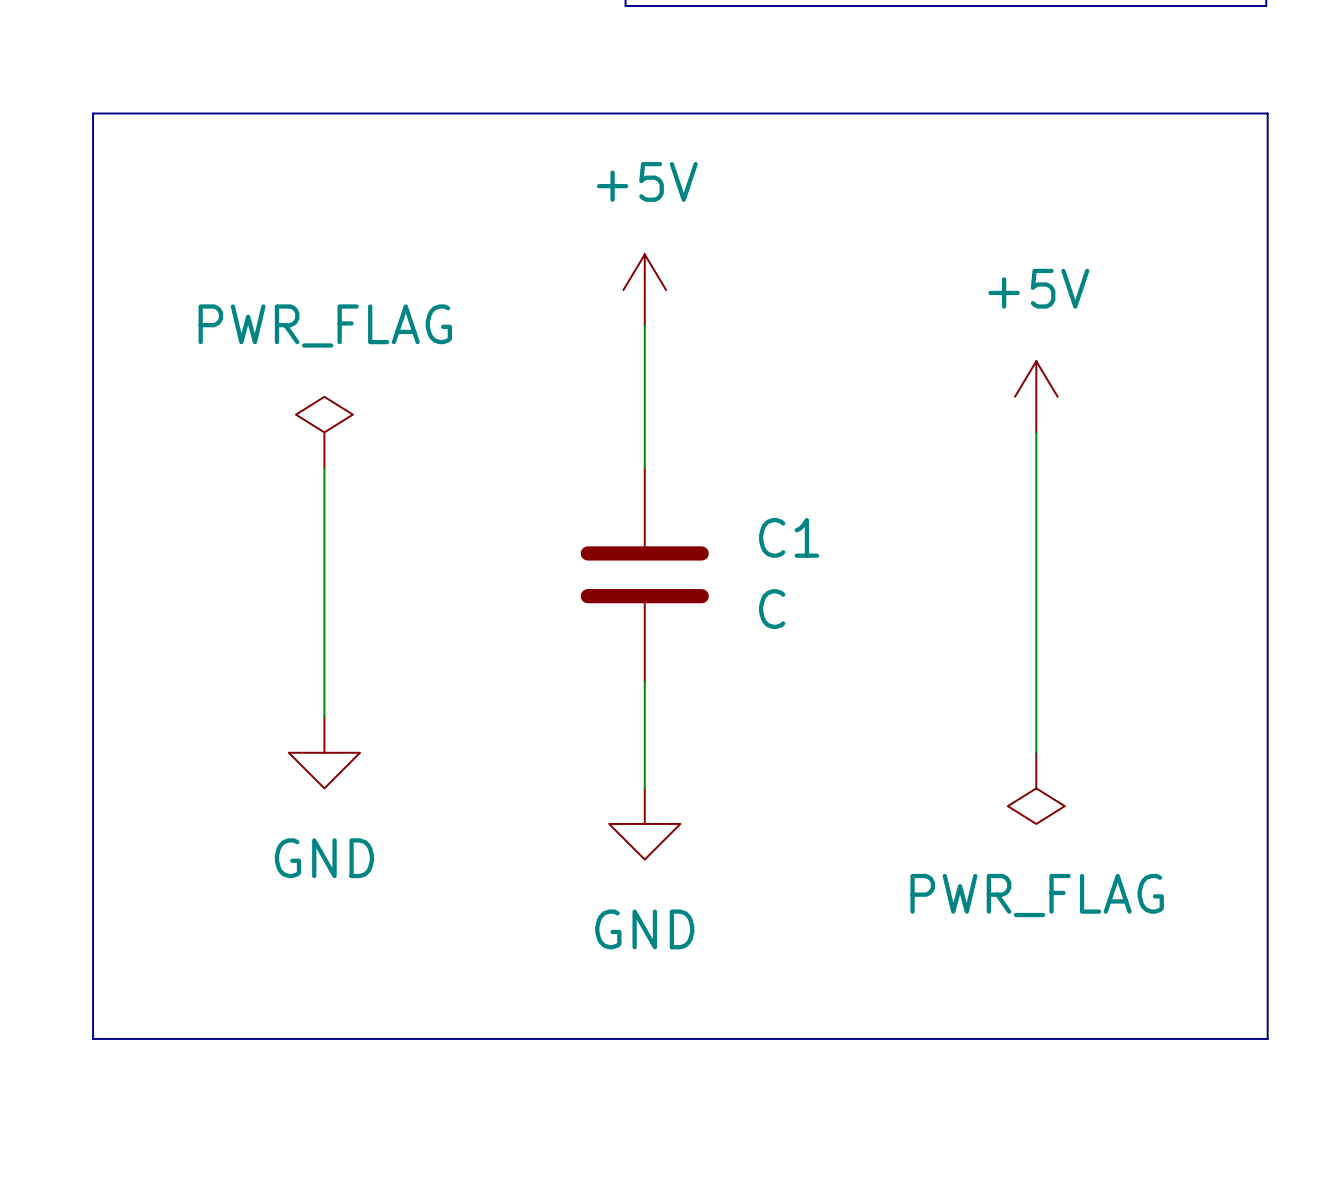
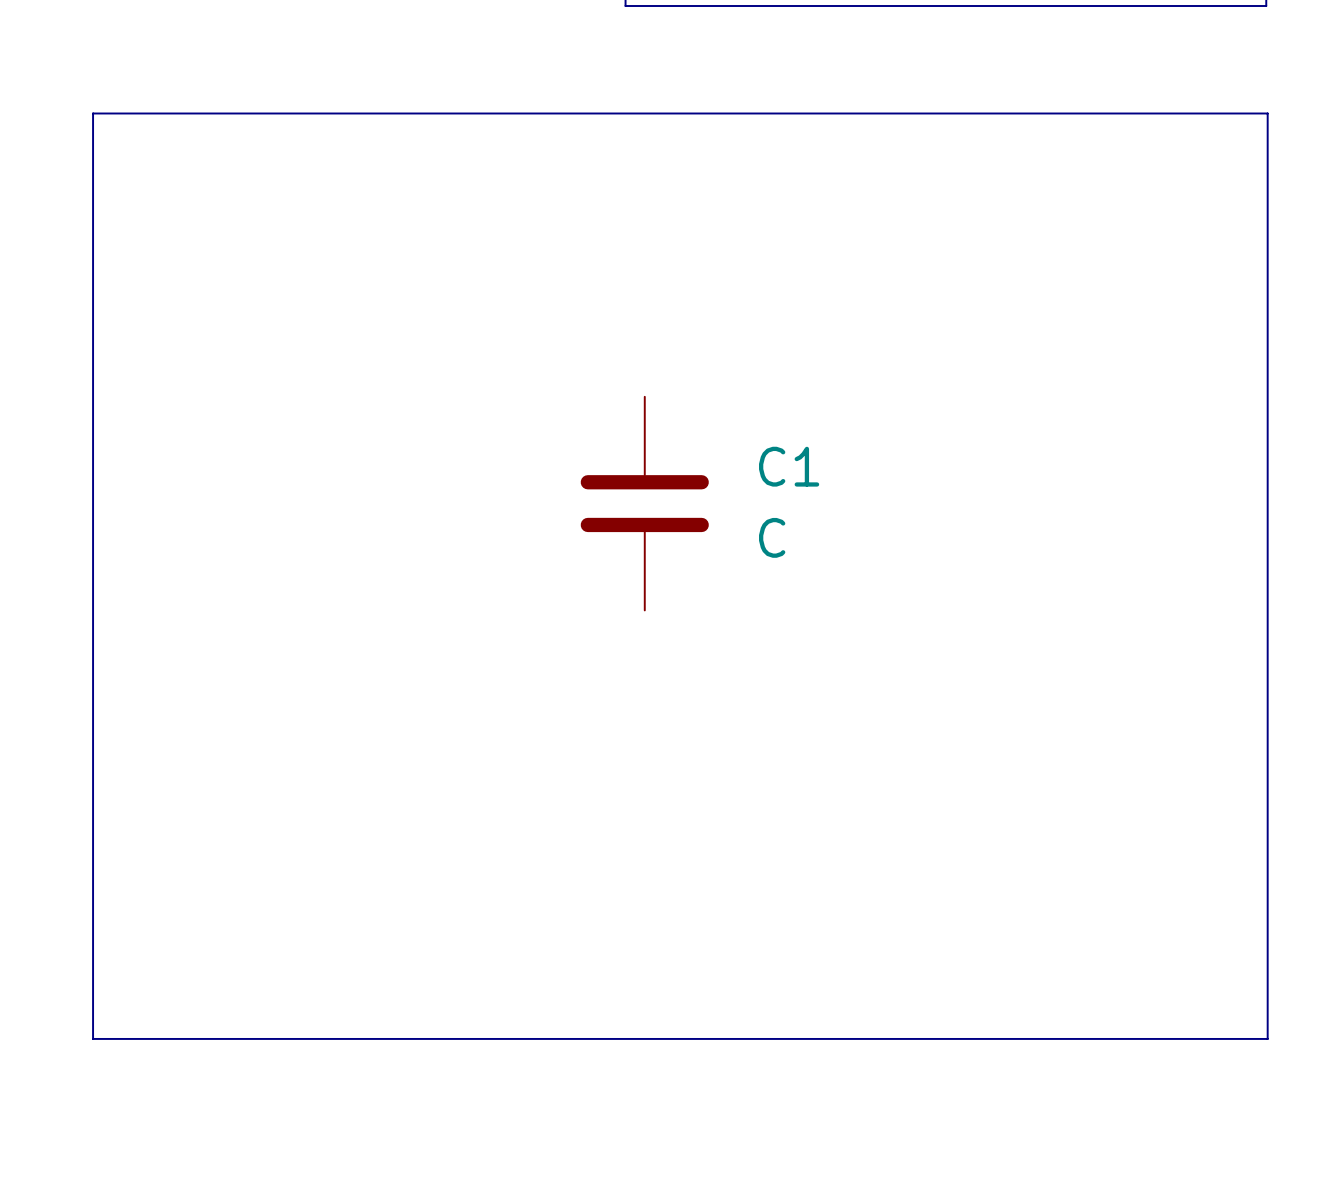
power symbol: +5V (644, 290) -> none
wire: (644, 325) (644, 468) -> none
power symbol: +5V (1036, 396) -> none
power symbol: PWR_FLAG (324, 432) -> none
wire: (1036, 432) (1036, 752) -> none
wire: (324, 468) (324, 717) -> none
C1 position: (644, 574) -> (644, 503)
wire: (644, 681) (644, 788) -> none
power symbol: GND (324, 752) -> none
power symbol: PWR_FLAG (1036, 788) -> none
power symbol: GND (644, 823) -> none

